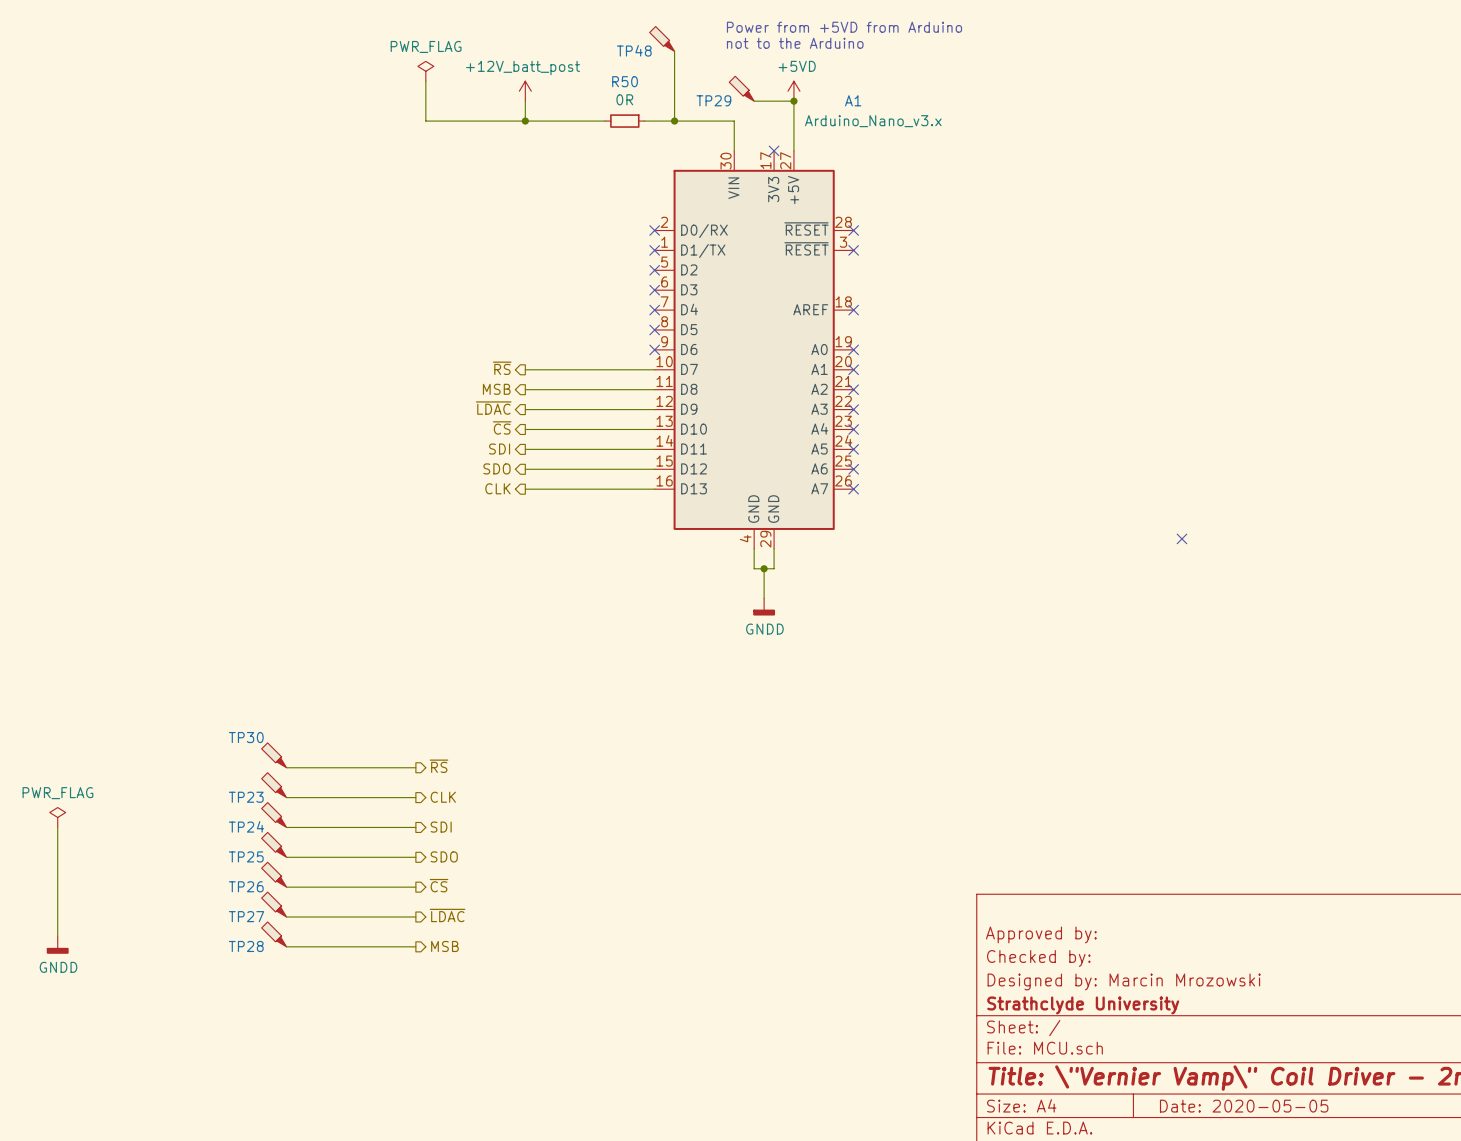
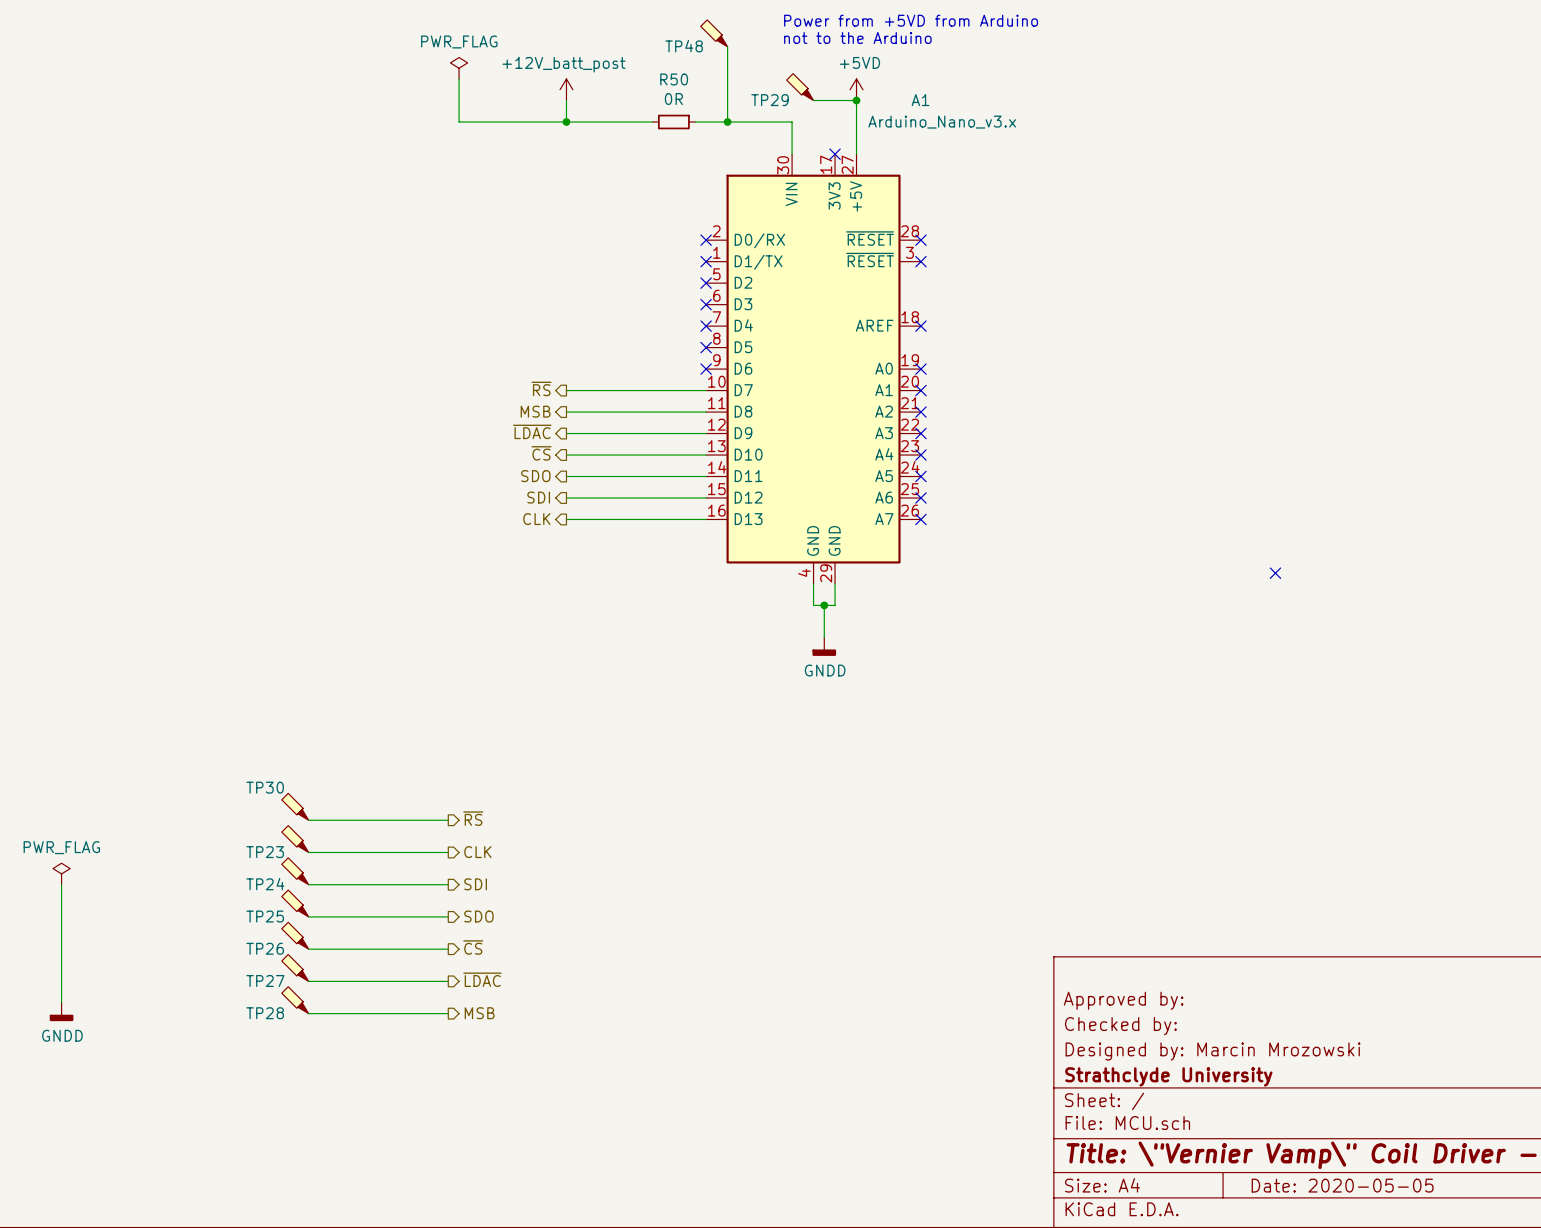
hierarchical label: SDI (499, 449) -> SDO (535, 476)
hierarchical label: SDO (496, 468) -> SDI (538, 497)

